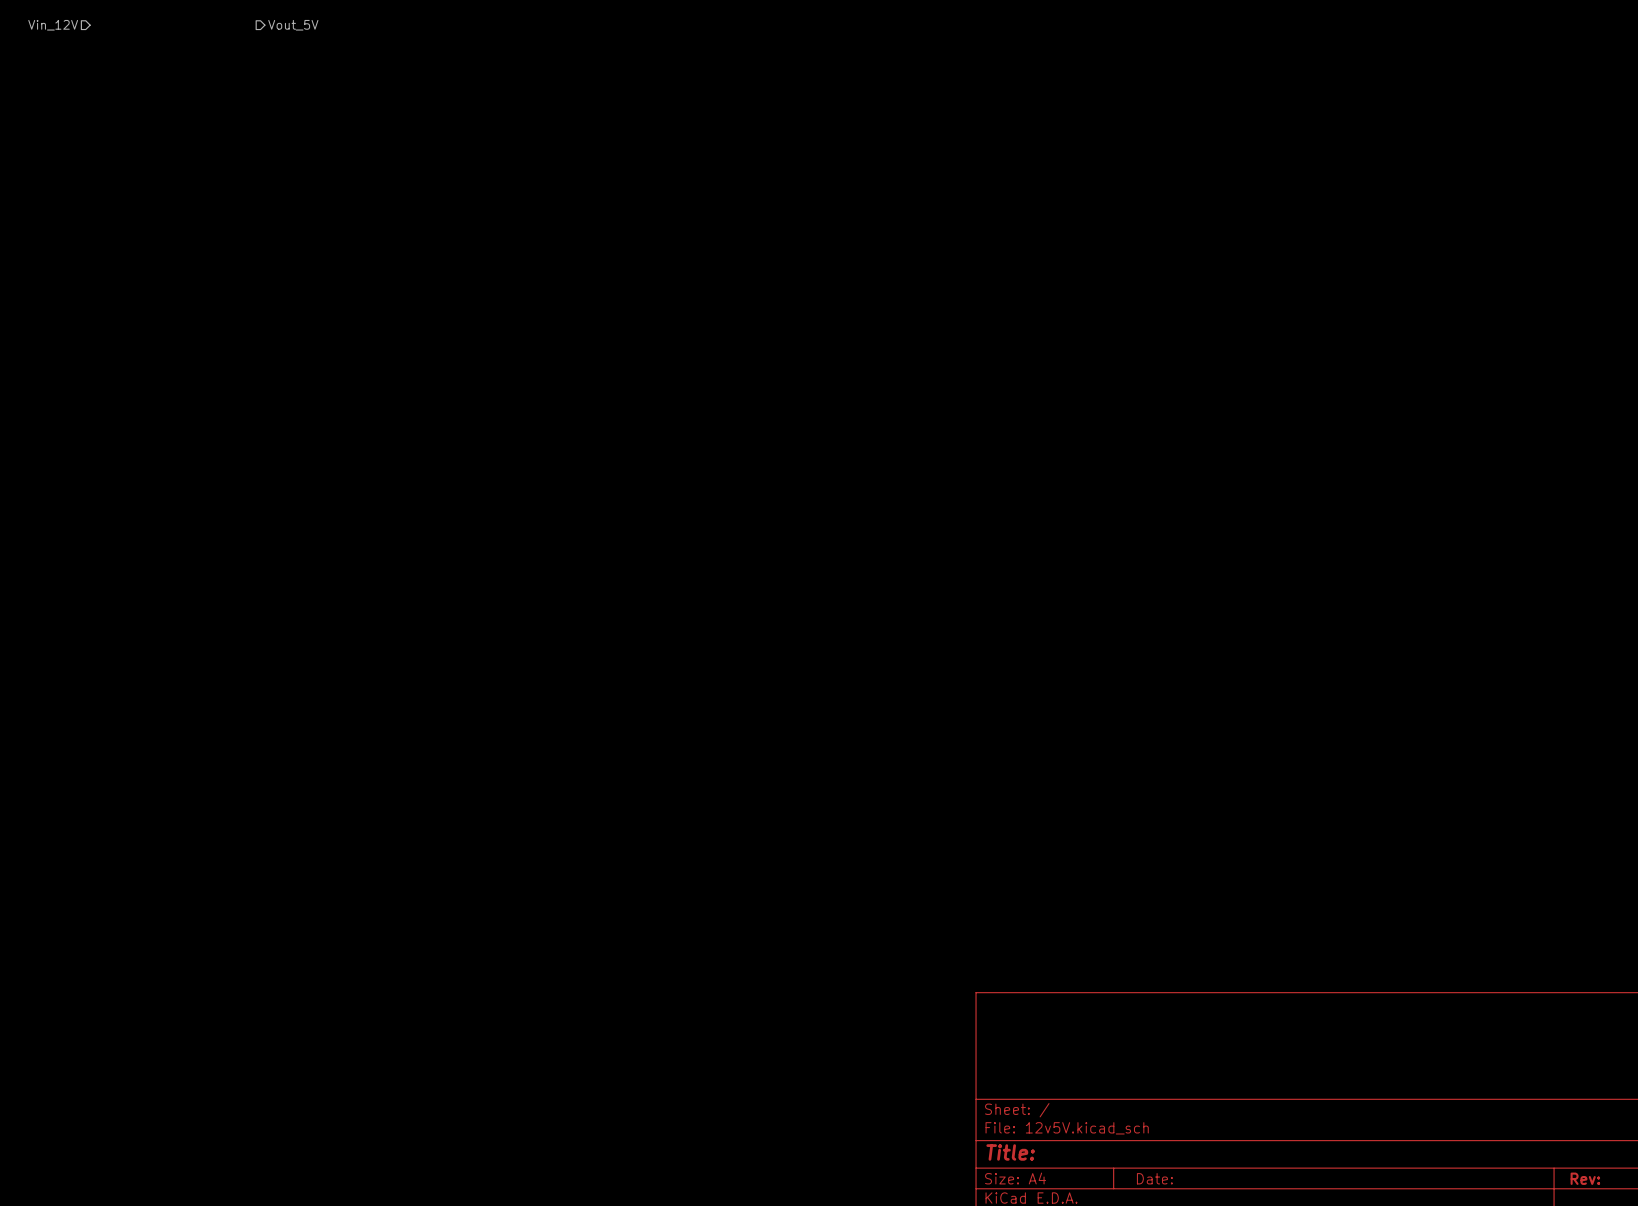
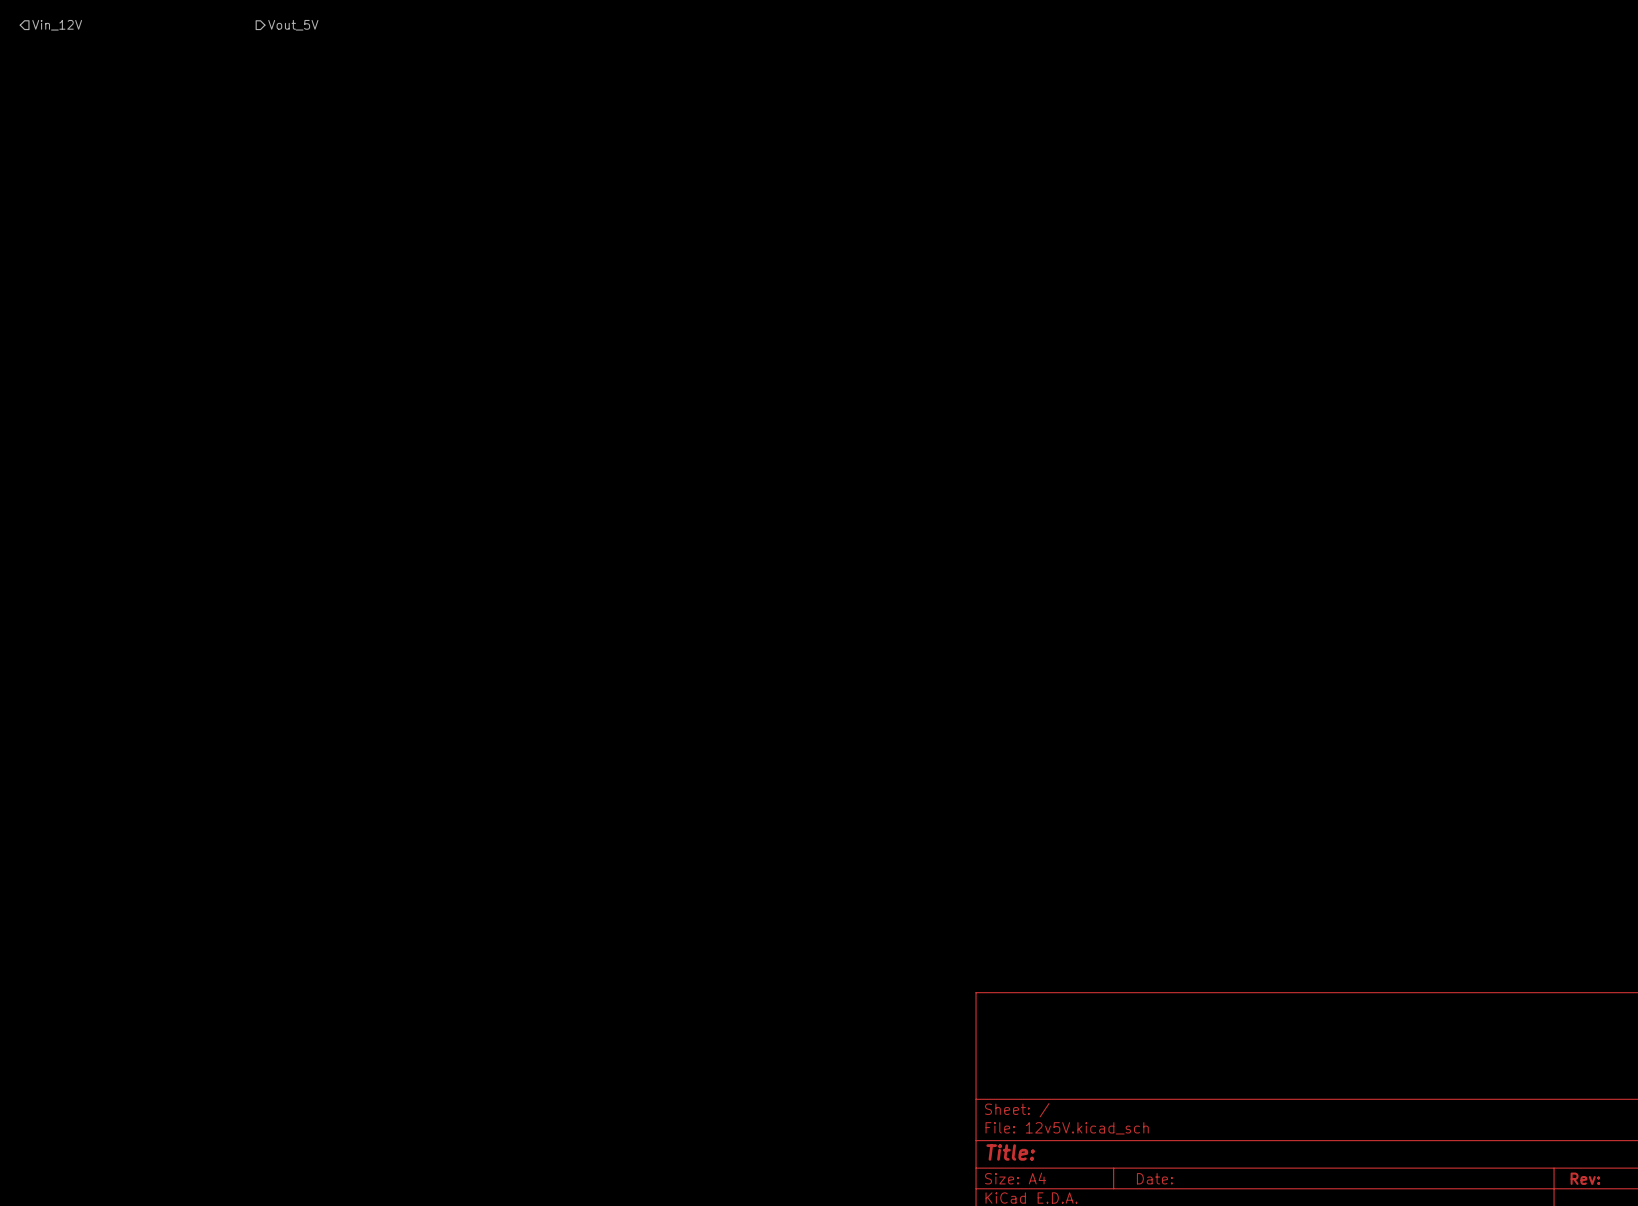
hierarchical label rotation: 0° (53, 25) -> 180° (57, 25)

